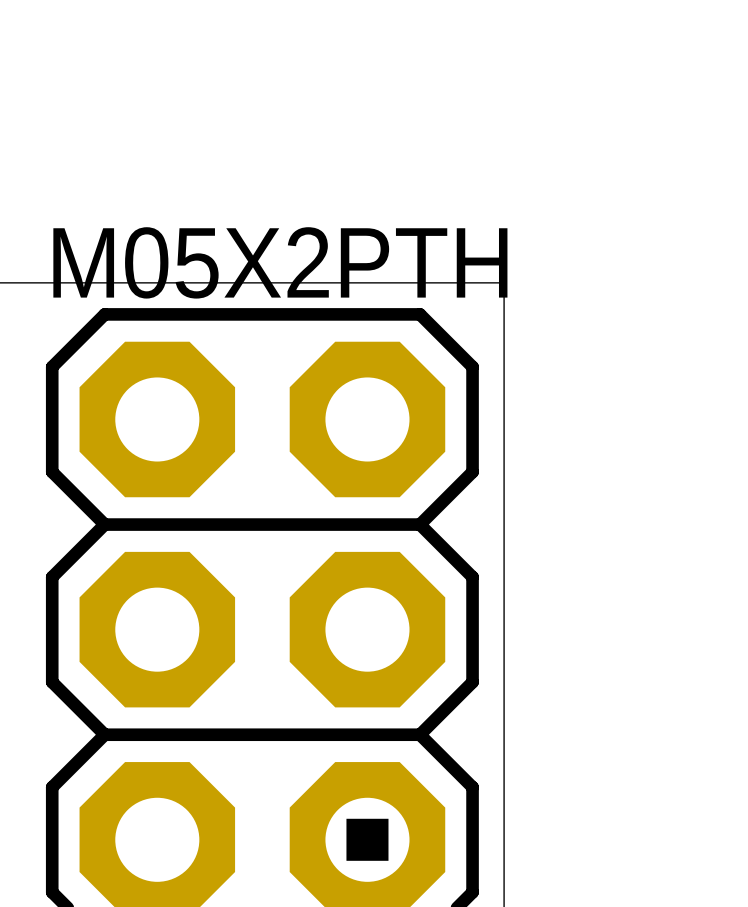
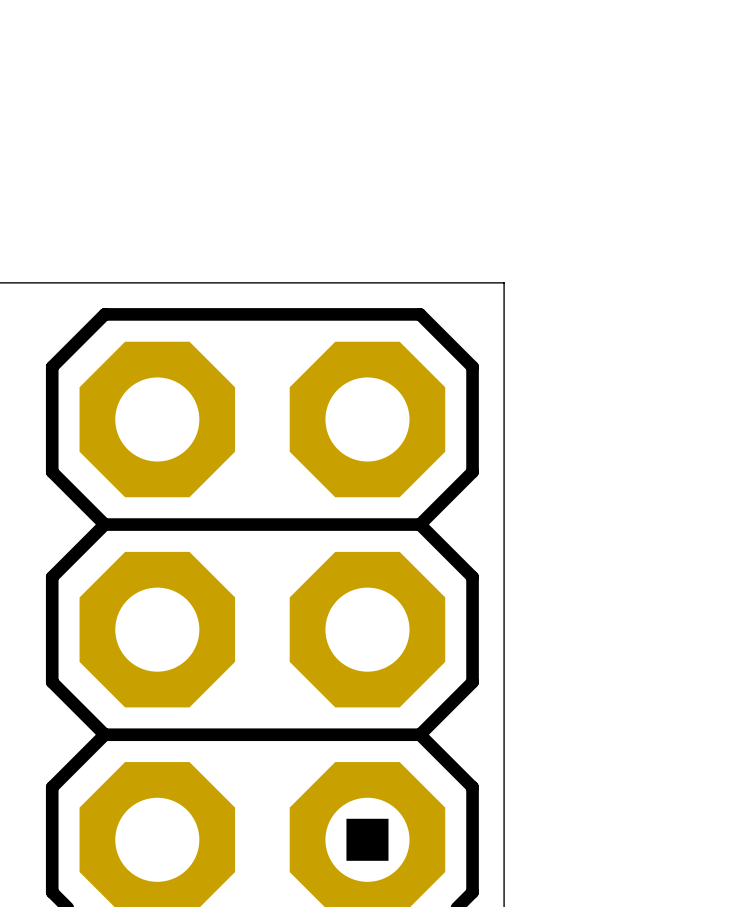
part value: M05X2PTH (280, 262) -> none

